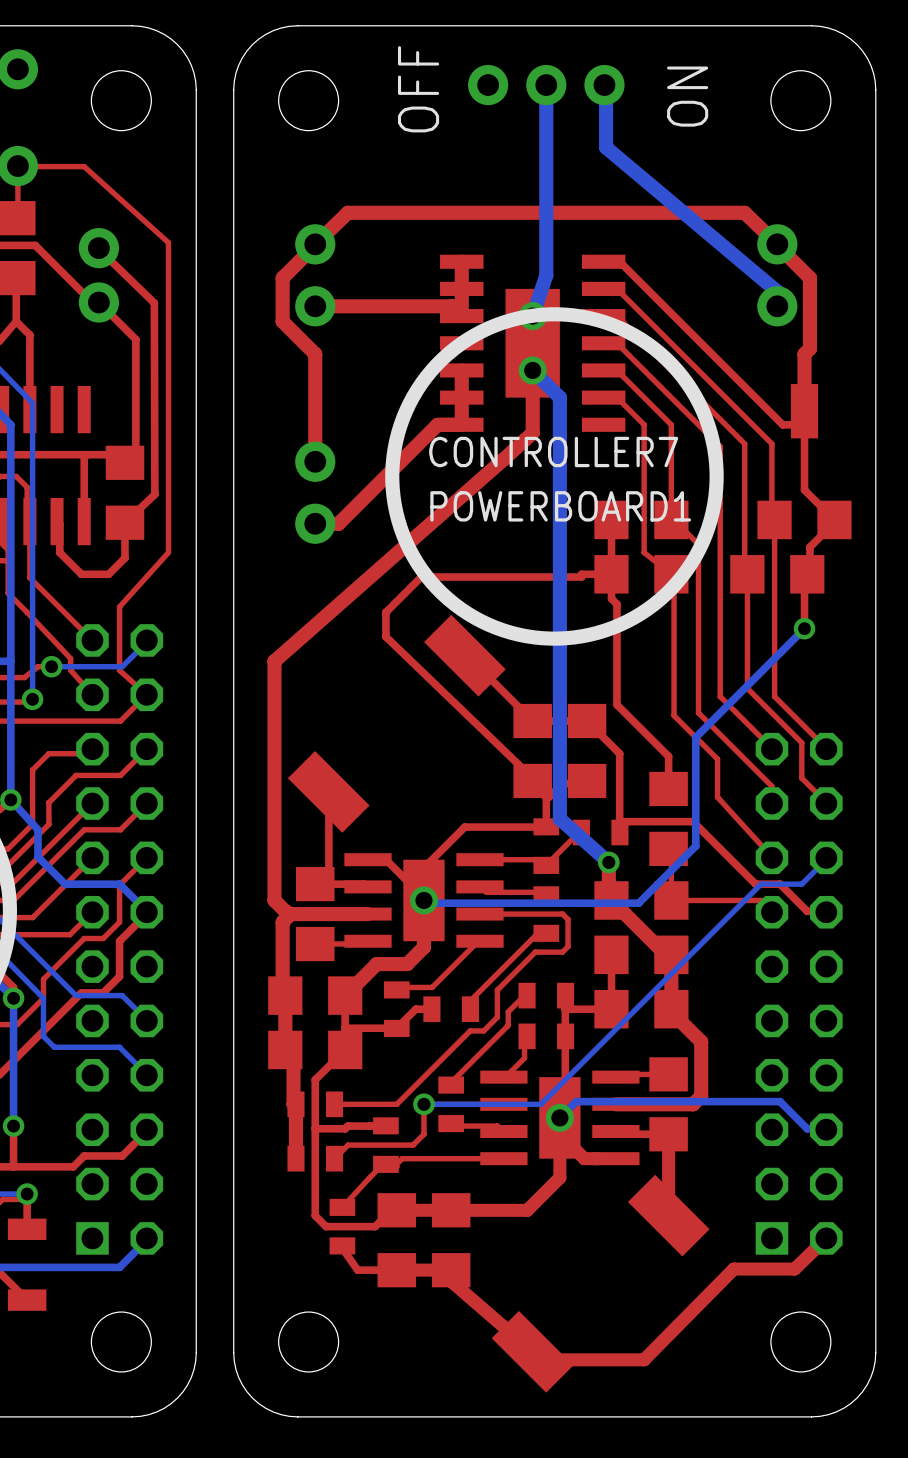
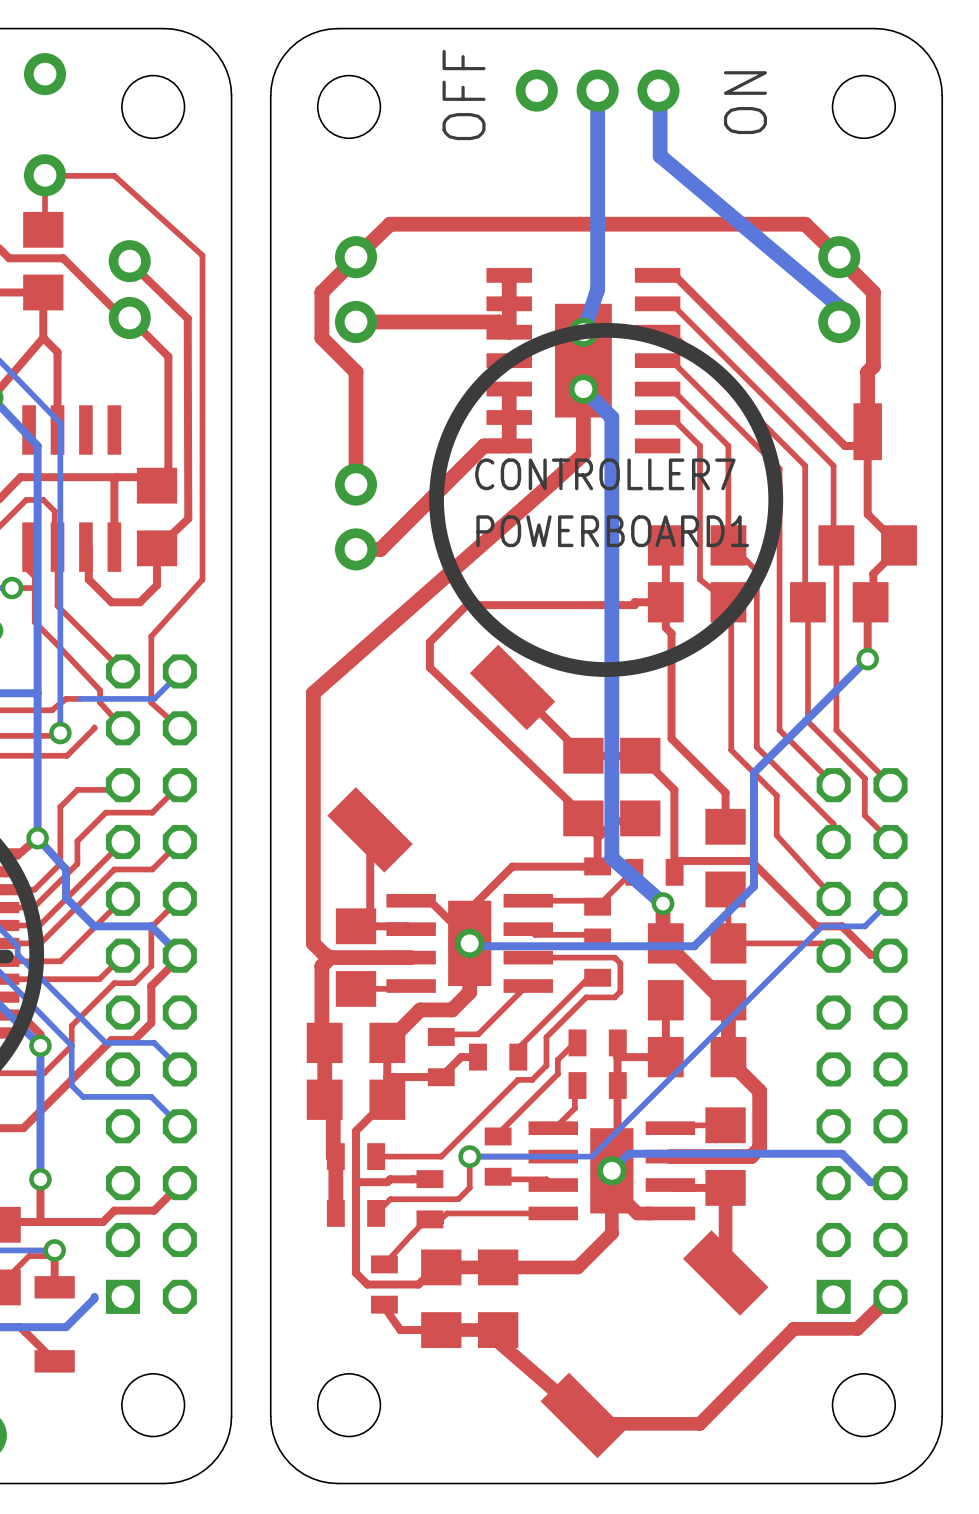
via: (51, 666) -> none
top track: (146, 693) (120, 721) (39, 721) -> (94, 727) (67, 755)
bottom track: (146, 1238) (119, 1267) (38, 1267) -> (94, 1296) (66, 1327)

